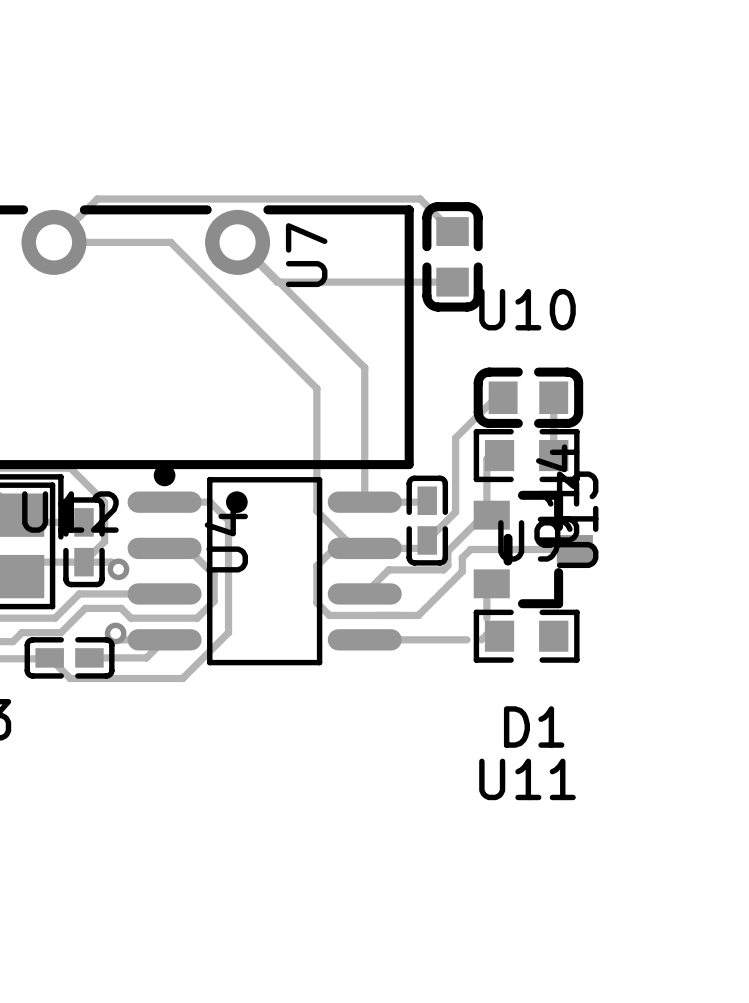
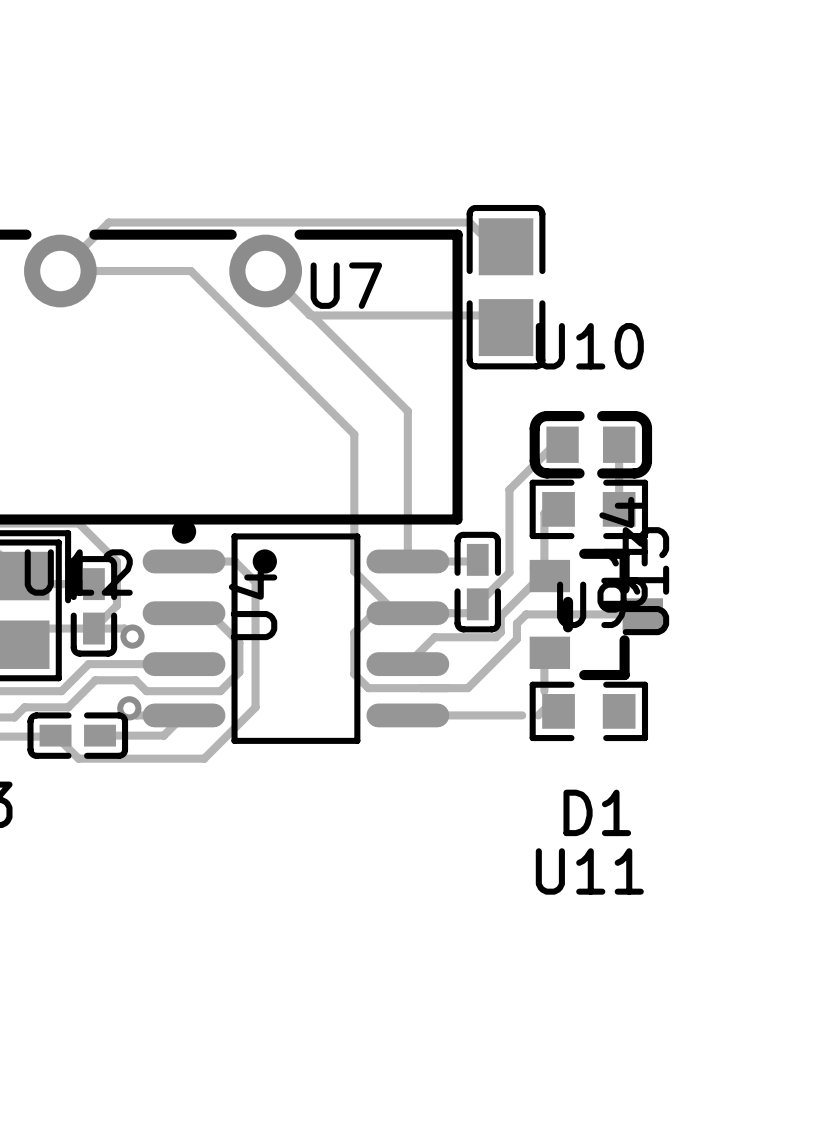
U7 footprint: [422, 202, 483, 312] -> [466, 204, 546, 370]
U7 name rotation: 0° (306, 255) -> 90° clockwise (346, 285)

